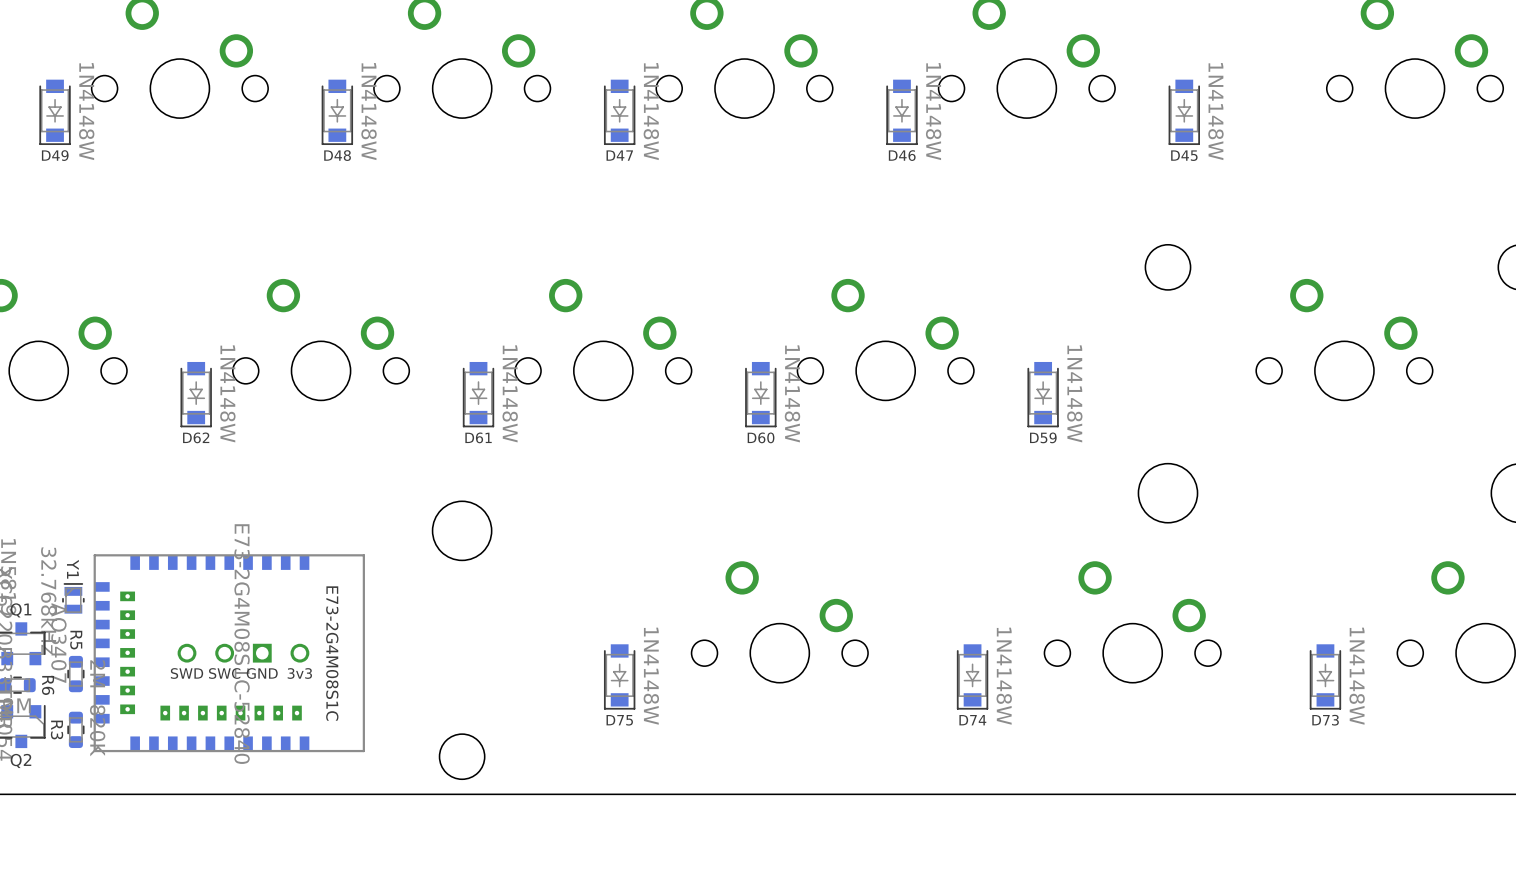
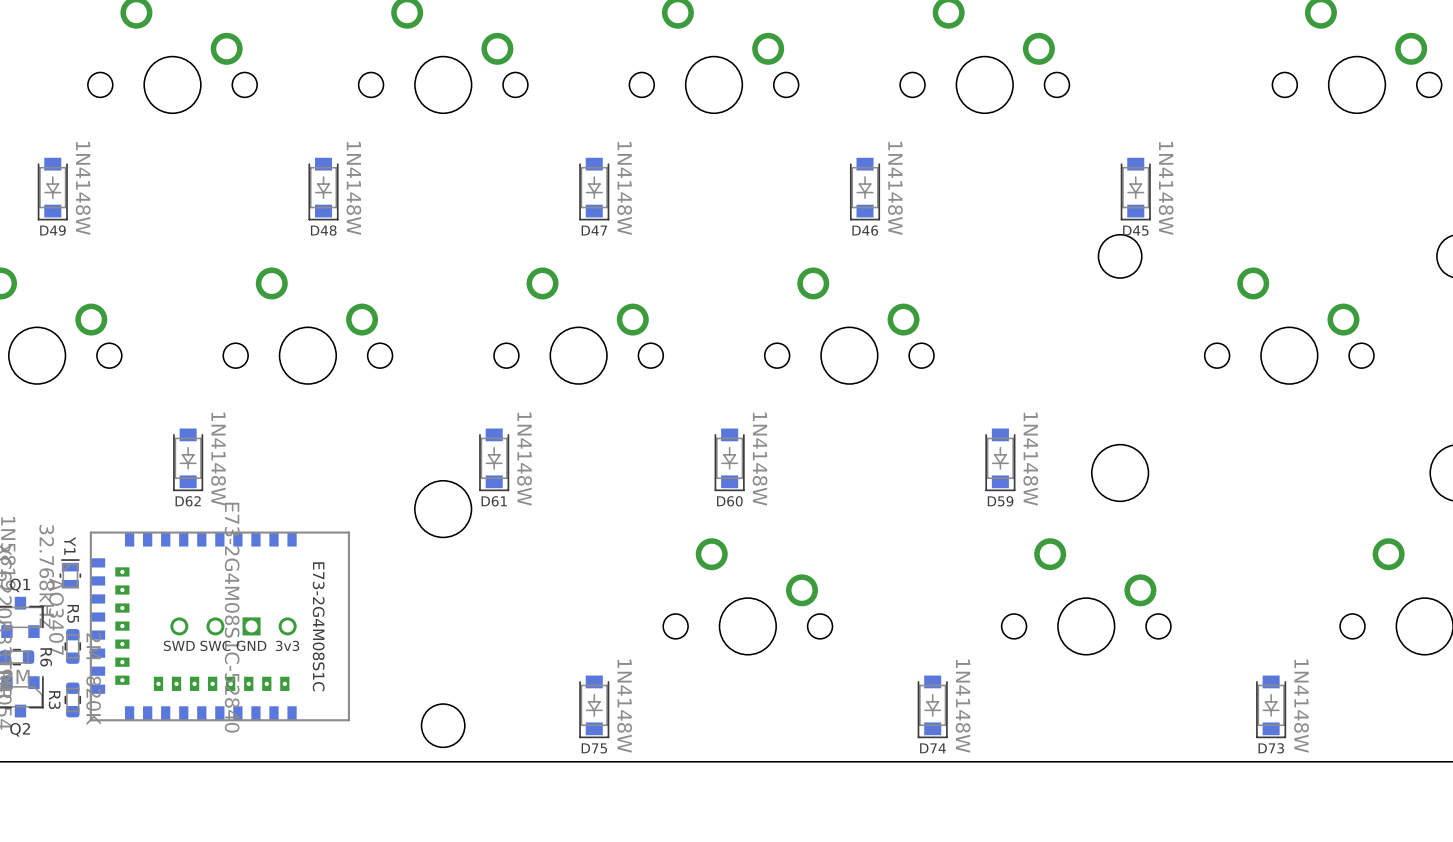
D49 position: (55, 112) -> (52, 189)
D48 position: (337, 112) -> (323, 189)
D47 position: (619, 112) -> (594, 189)
D46 position: (901, 112) -> (865, 189)
D45 position: (1184, 112) -> (1135, 189)
D62 position: (196, 394) -> (188, 459)
D61 position: (478, 394) -> (494, 459)
D60 position: (760, 394) -> (729, 459)
D59 position: (1043, 394) -> (1000, 459)
D75 position: (619, 676) -> (594, 706)
D74 position: (972, 676) -> (932, 706)
D73 position: (1325, 676) -> (1271, 706)

